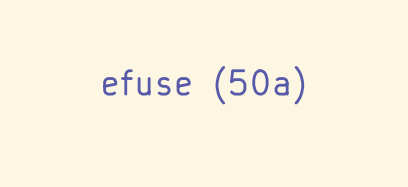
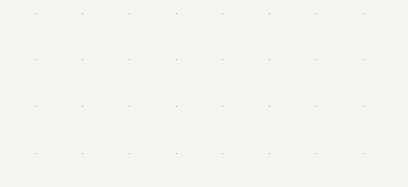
text: efuse (50a) (203, 85) -> none

